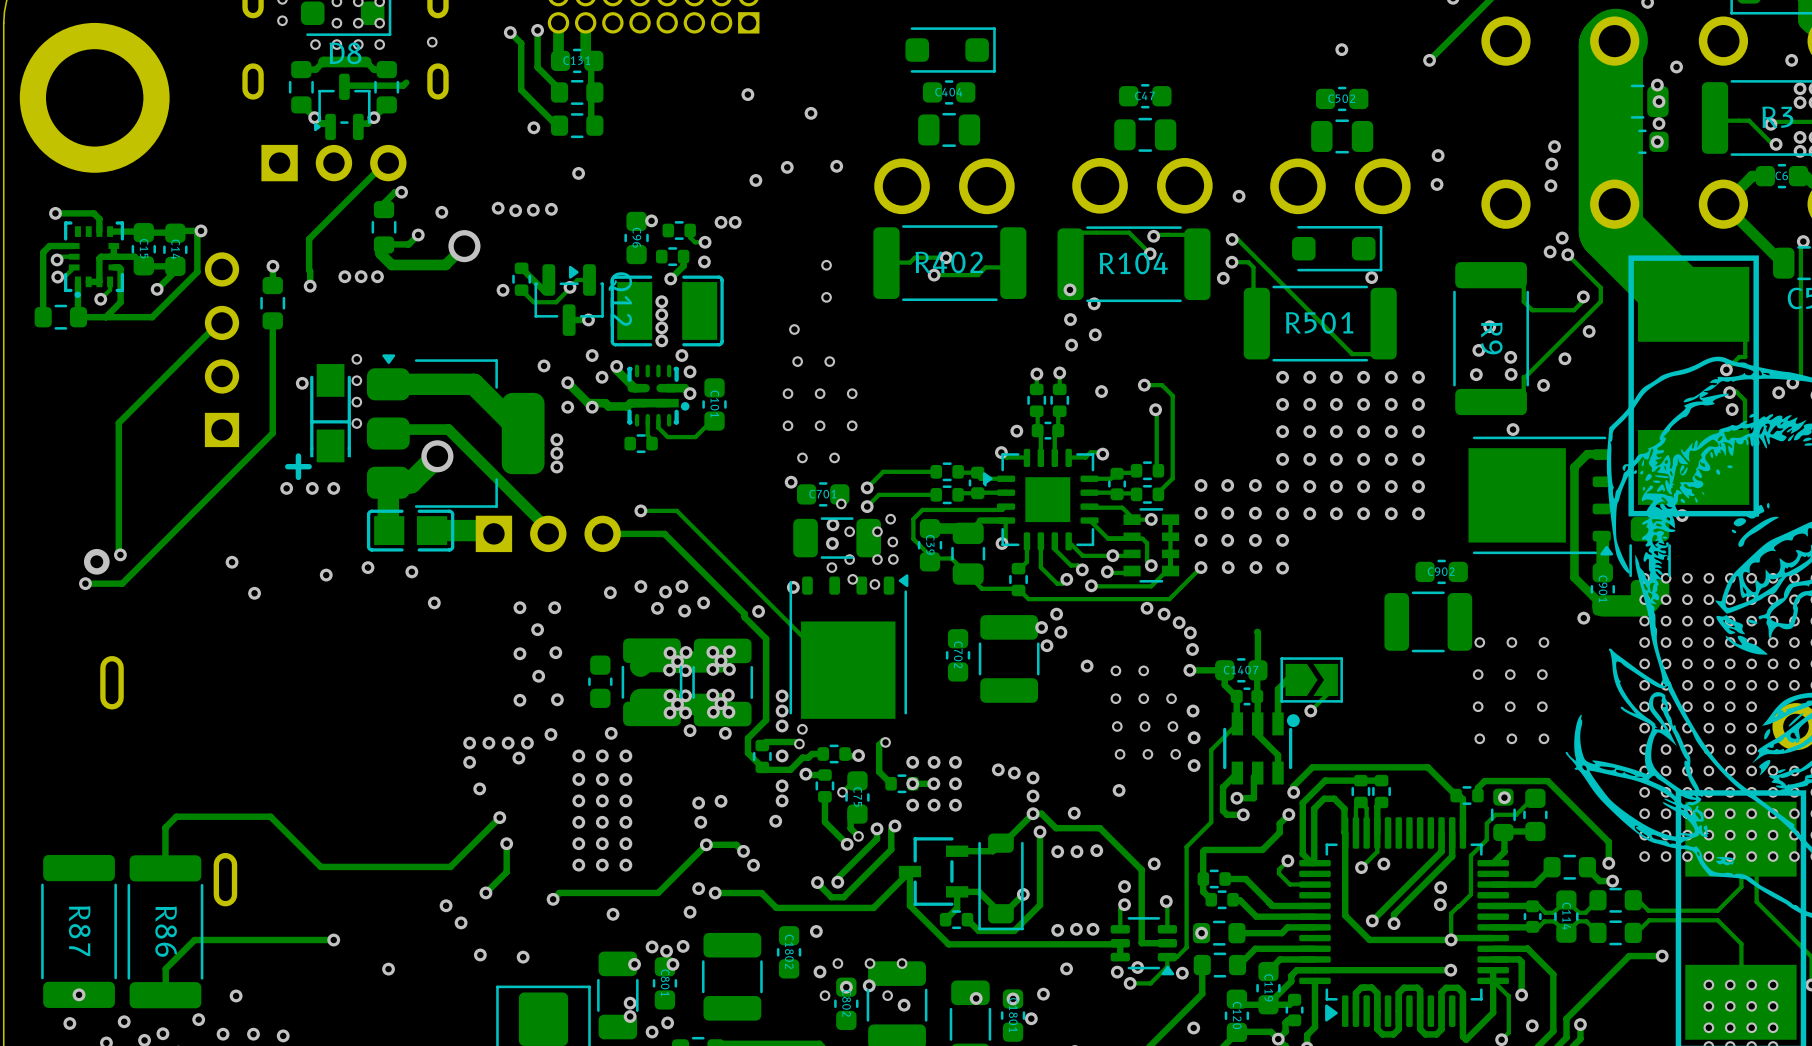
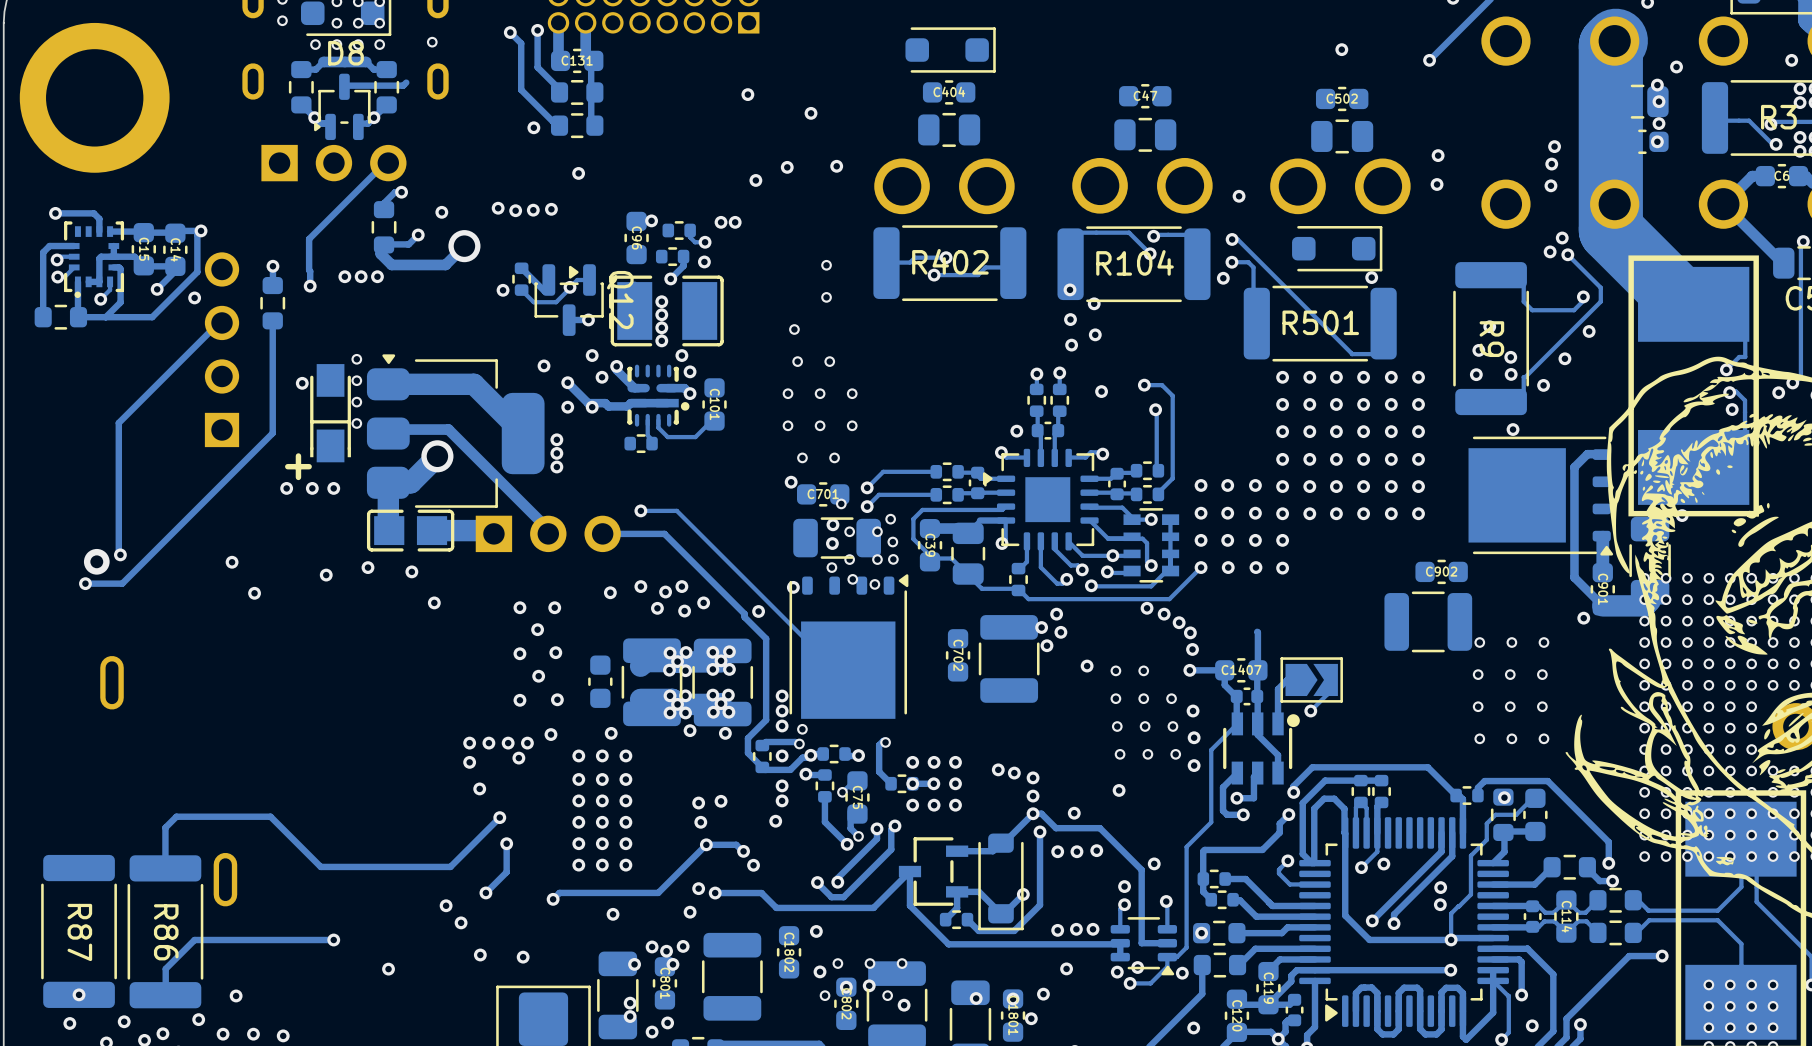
via: none -> (194, 297)
via: none -> (810, 755)

